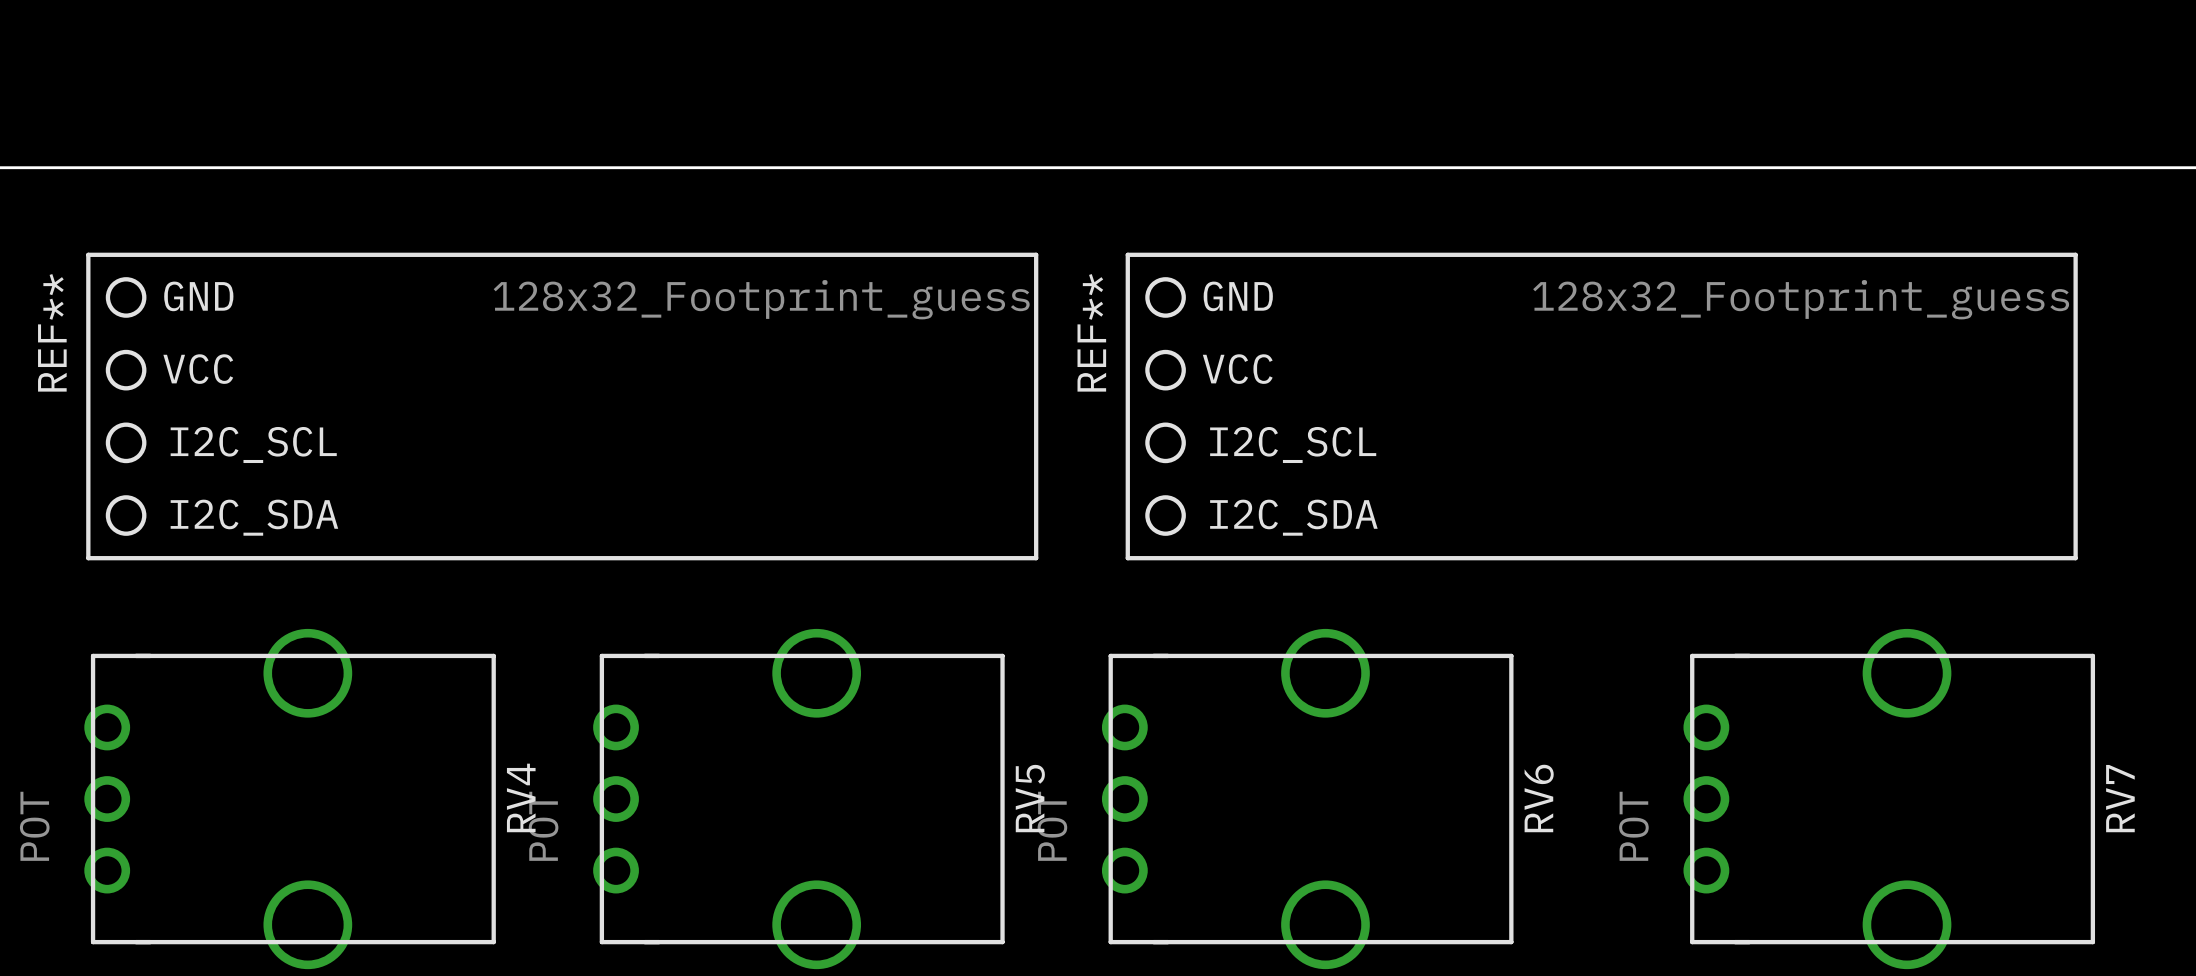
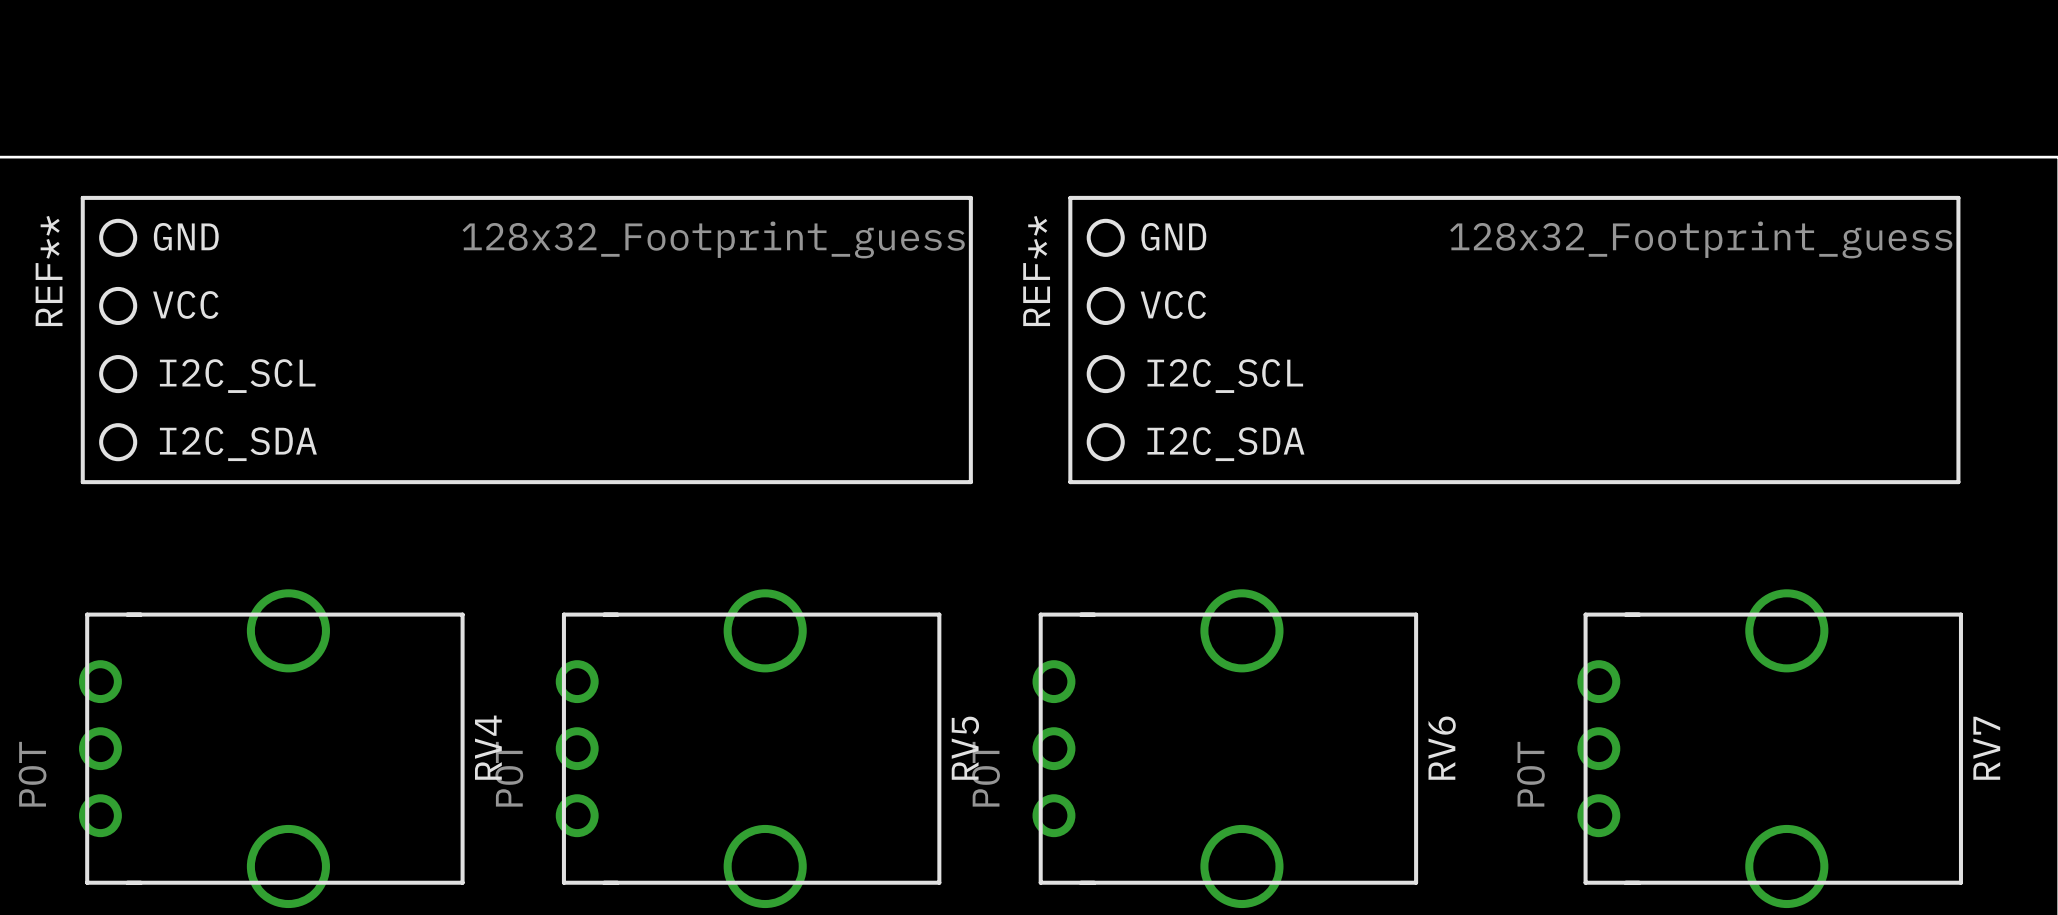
REF** position: (562, 406) -> (526, 340)
REF** position: (1601, 406) -> (1514, 340)

